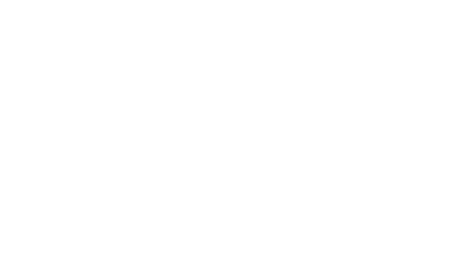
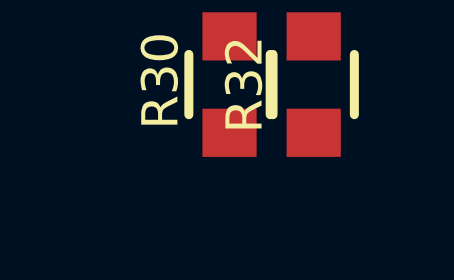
R30: none -> (229, 84)
R32: none -> (313, 84)

